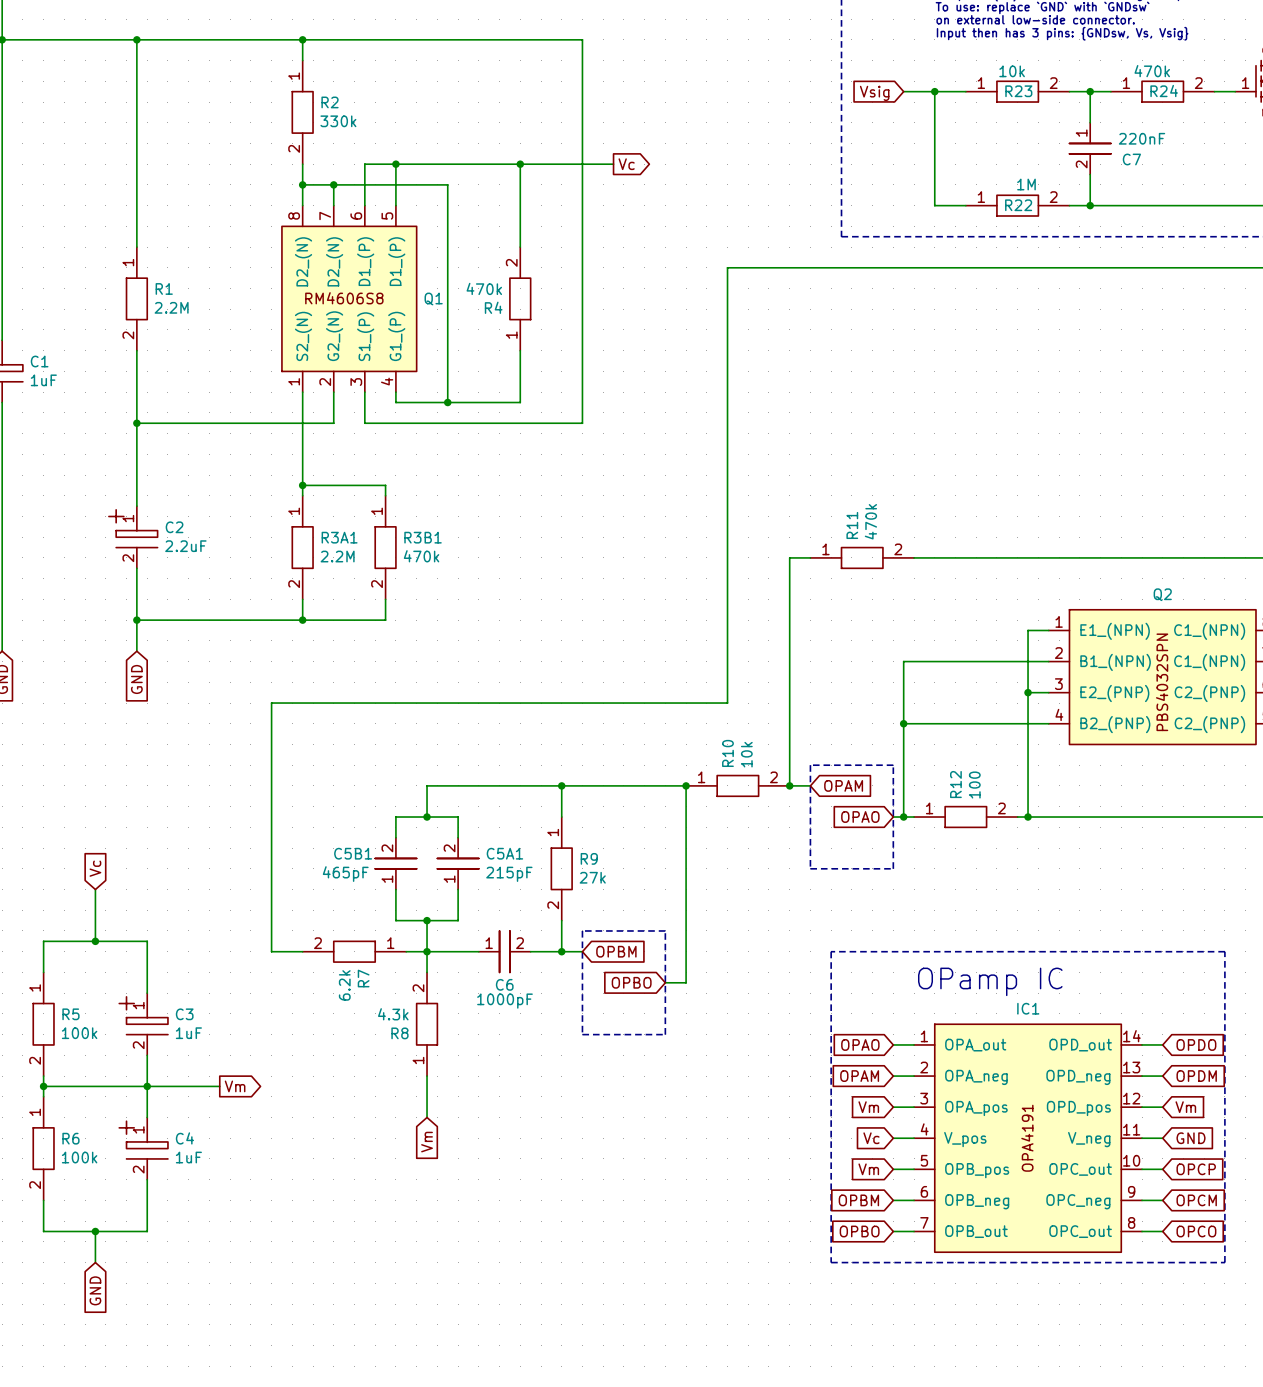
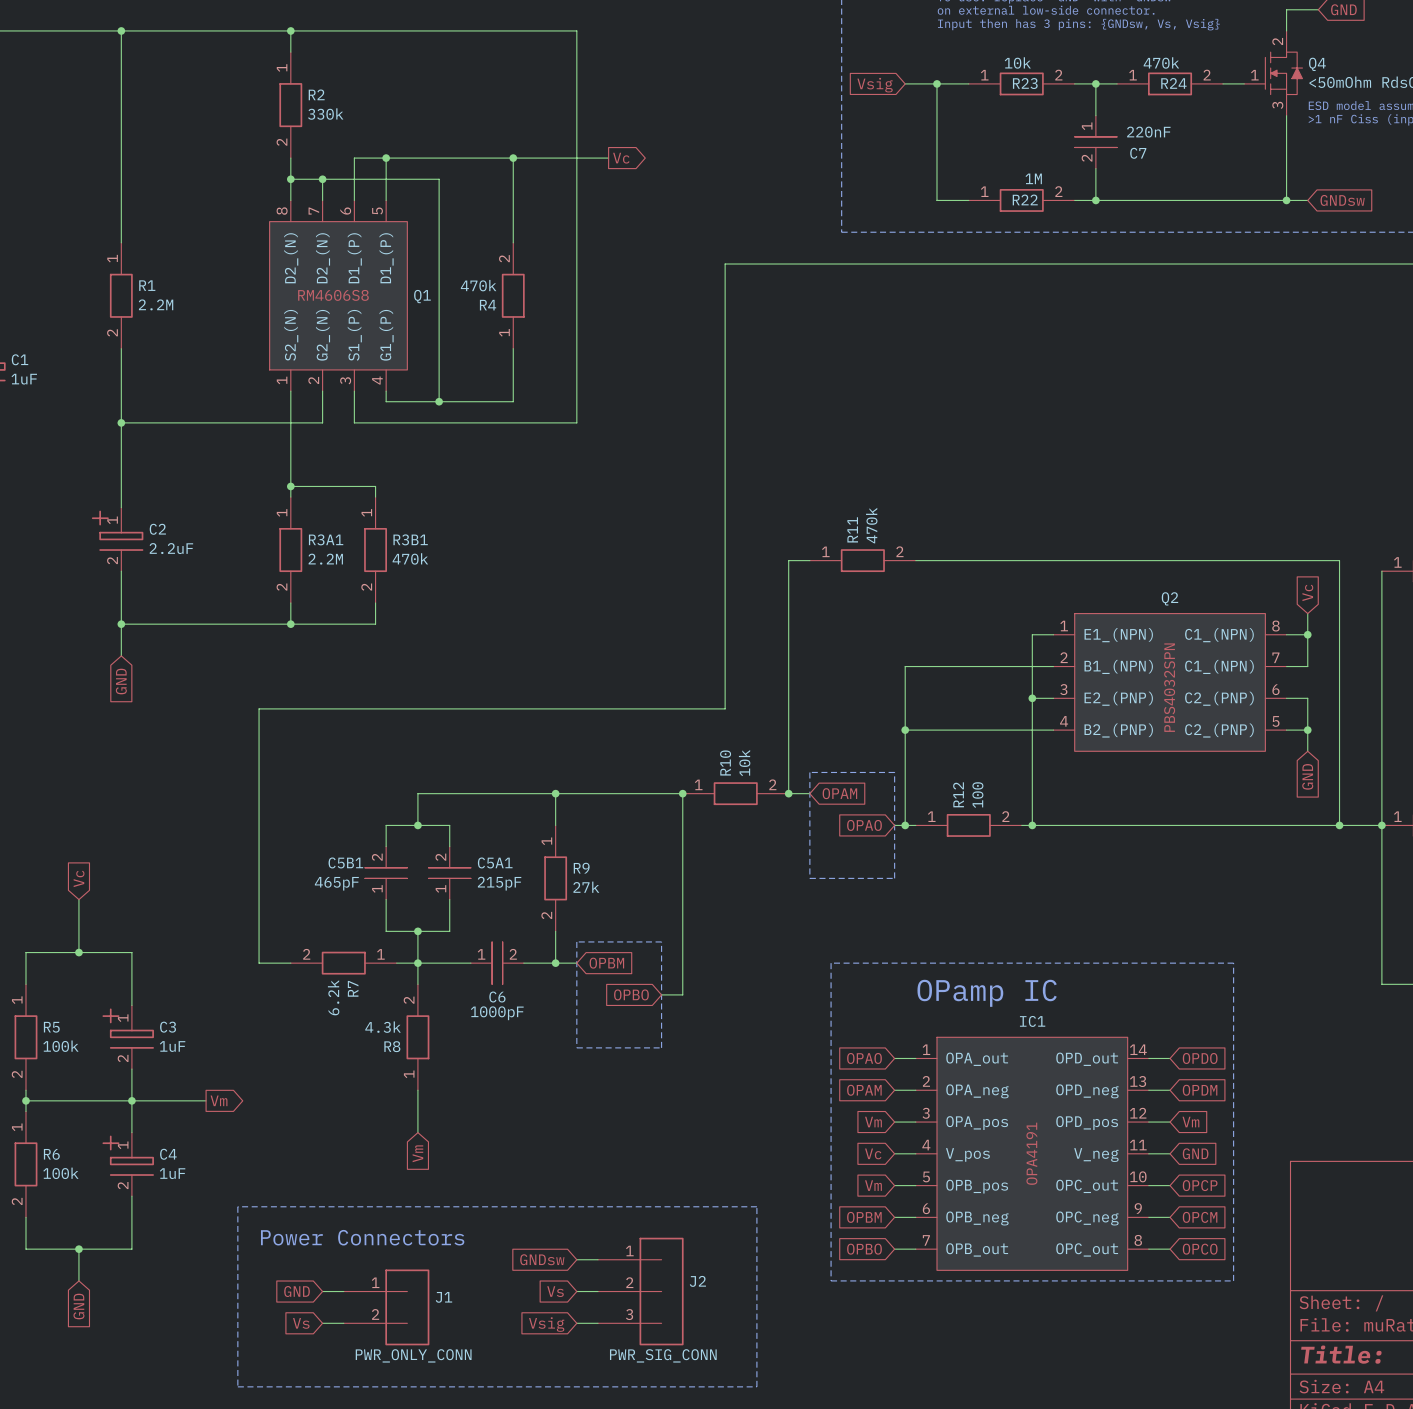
line: none -> (237, 1206) (237, 1386) (756, 1386) (756, 1206) (237, 1206)
text: none -> Power Connectors (362, 1237)
global label: none -> GNDsw (542, 1259)
wire: none -> (576, 1259) (598, 1259)
global label: none -> GND (297, 1291)
wire: none -> (322, 1291) (343, 1291)
global label: none -> Vs (555, 1291)
wire: none -> (576, 1291) (598, 1291)
J2: none -> PWR_SIG_CONN (640, 1291)
J1: none -> PWR_ONLY_CONN (386, 1307)
global label: none -> Vs (301, 1323)
wire: none -> (322, 1323) (343, 1323)
wire: none -> (576, 1323) (598, 1323)
global label: none -> Vsig (546, 1324)

